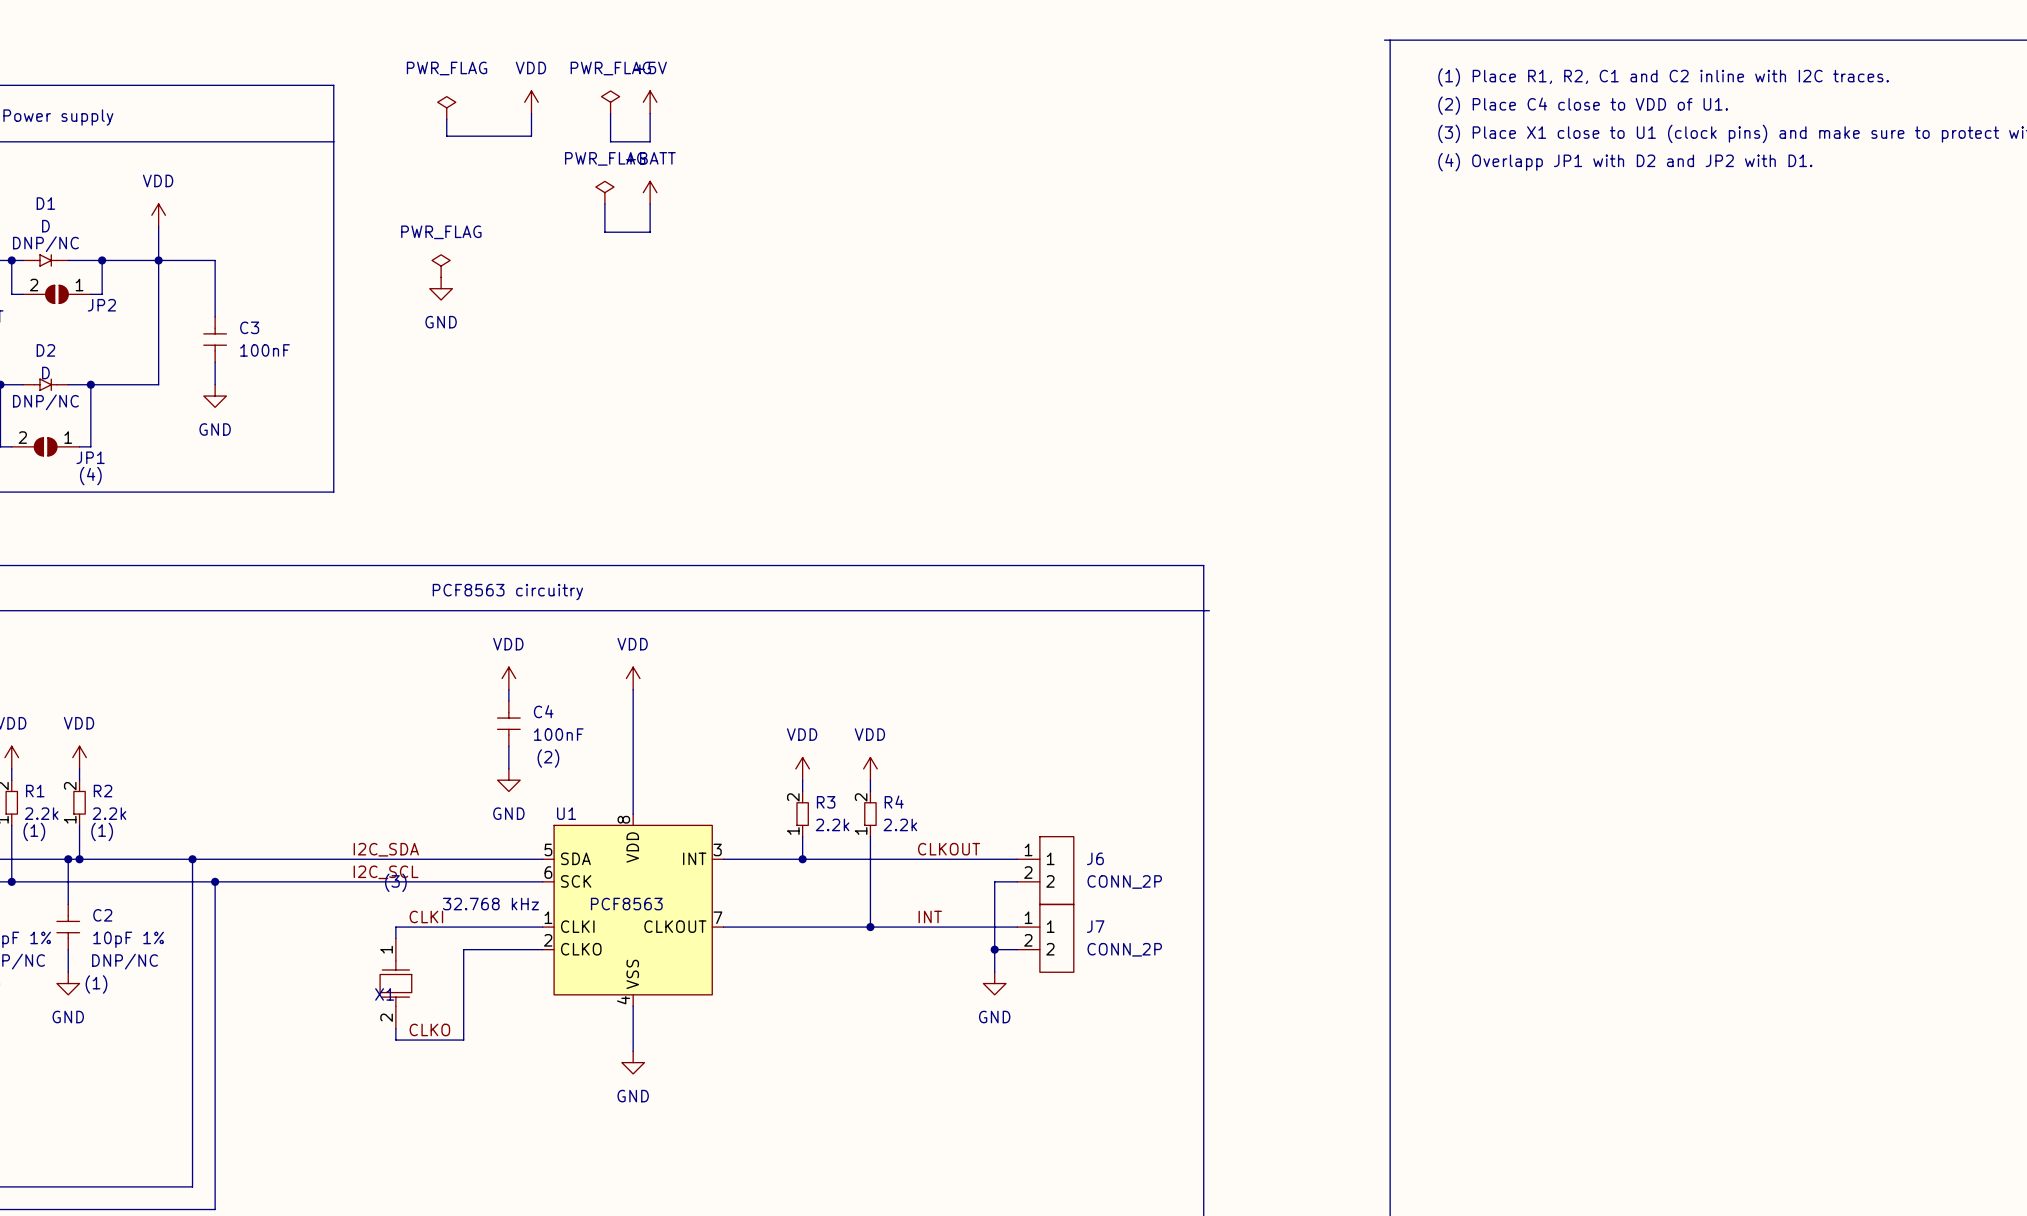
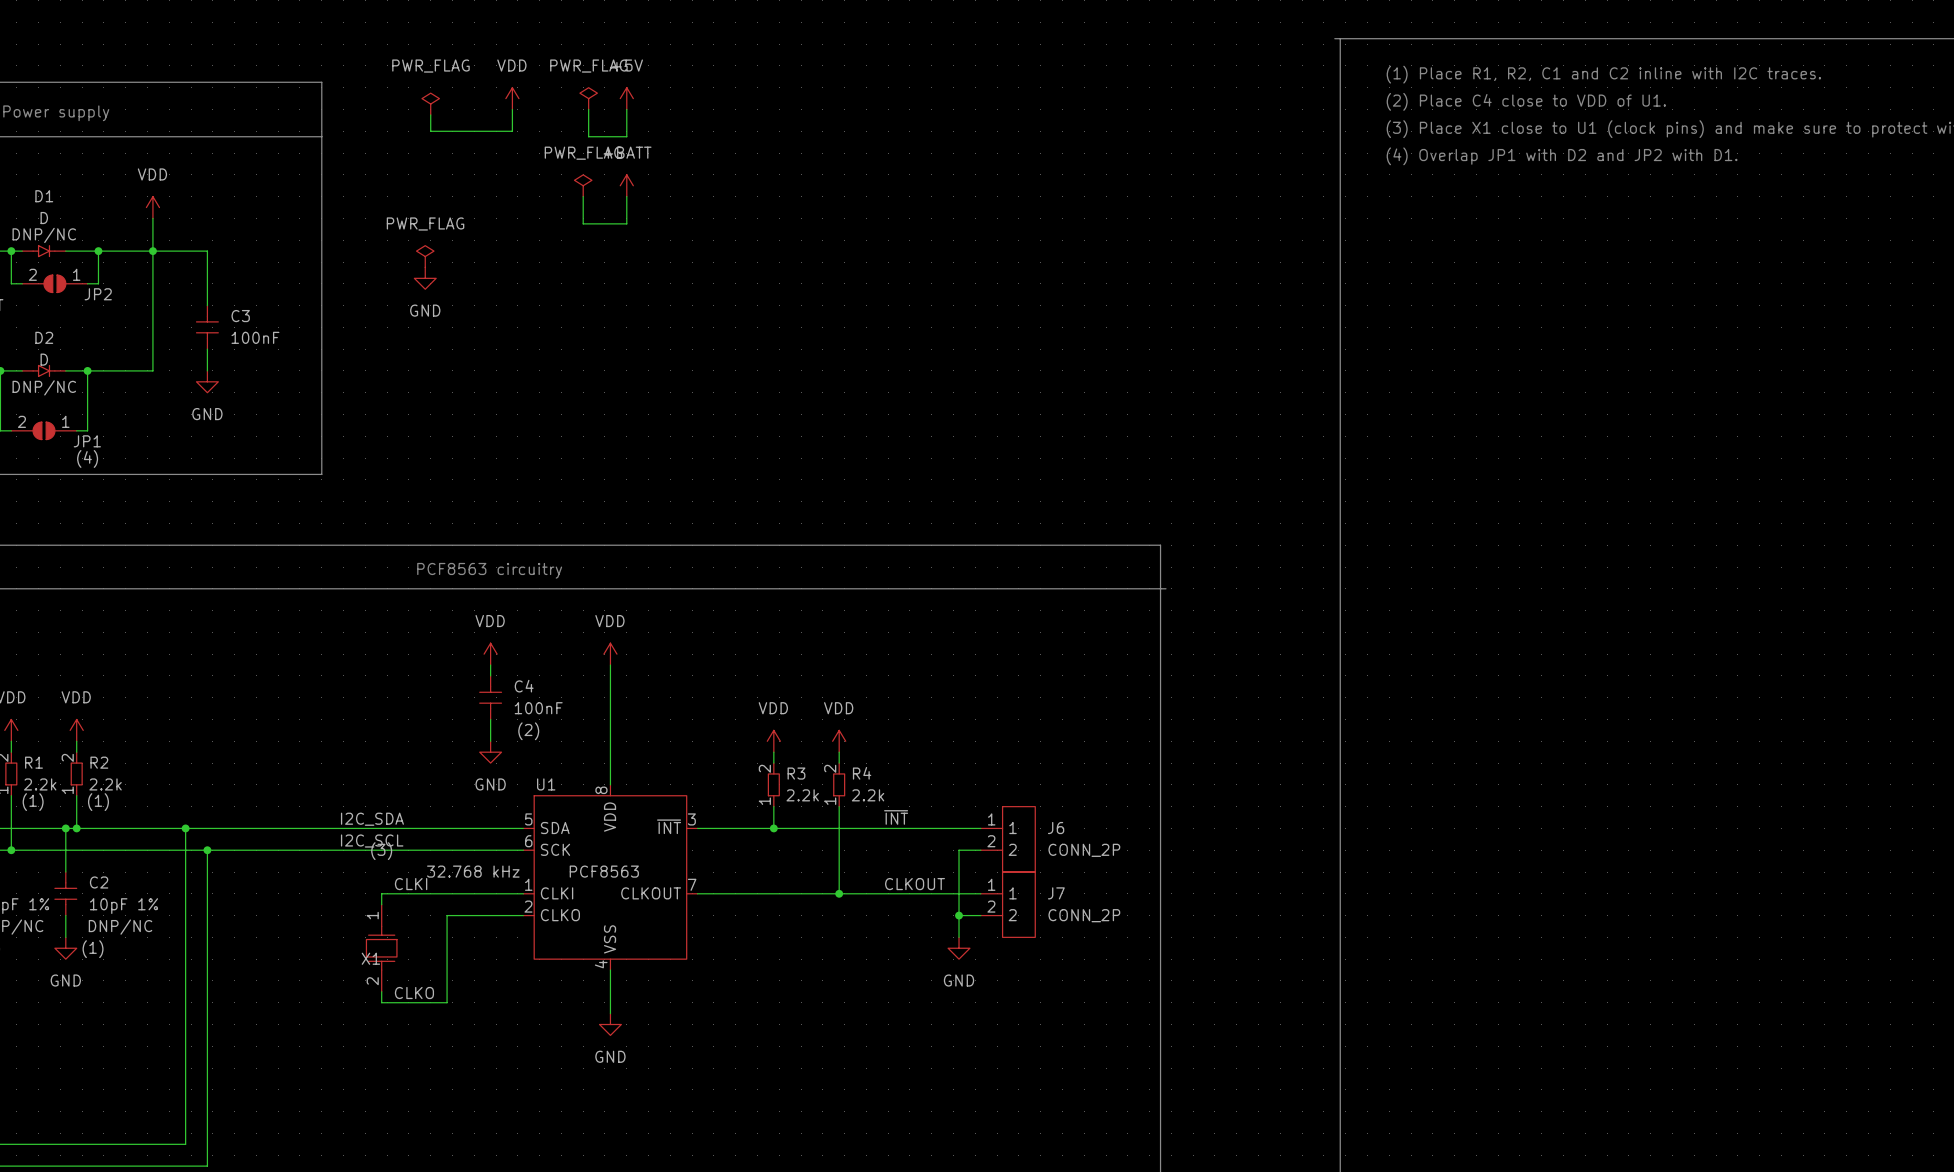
text: (4) Overlapp JP1 with D2 and JP2 with D1. (1625, 162) -> (4) Overlap JP1 with D2 and JP2 with D1. (1562, 156)
label: CLKOUT (949, 849) -> ~{INT} (896, 817)
U1 pin name: INT (694, 858) -> ~{INT} (669, 826)
label: INT (930, 916) -> CLKOUT (915, 884)

